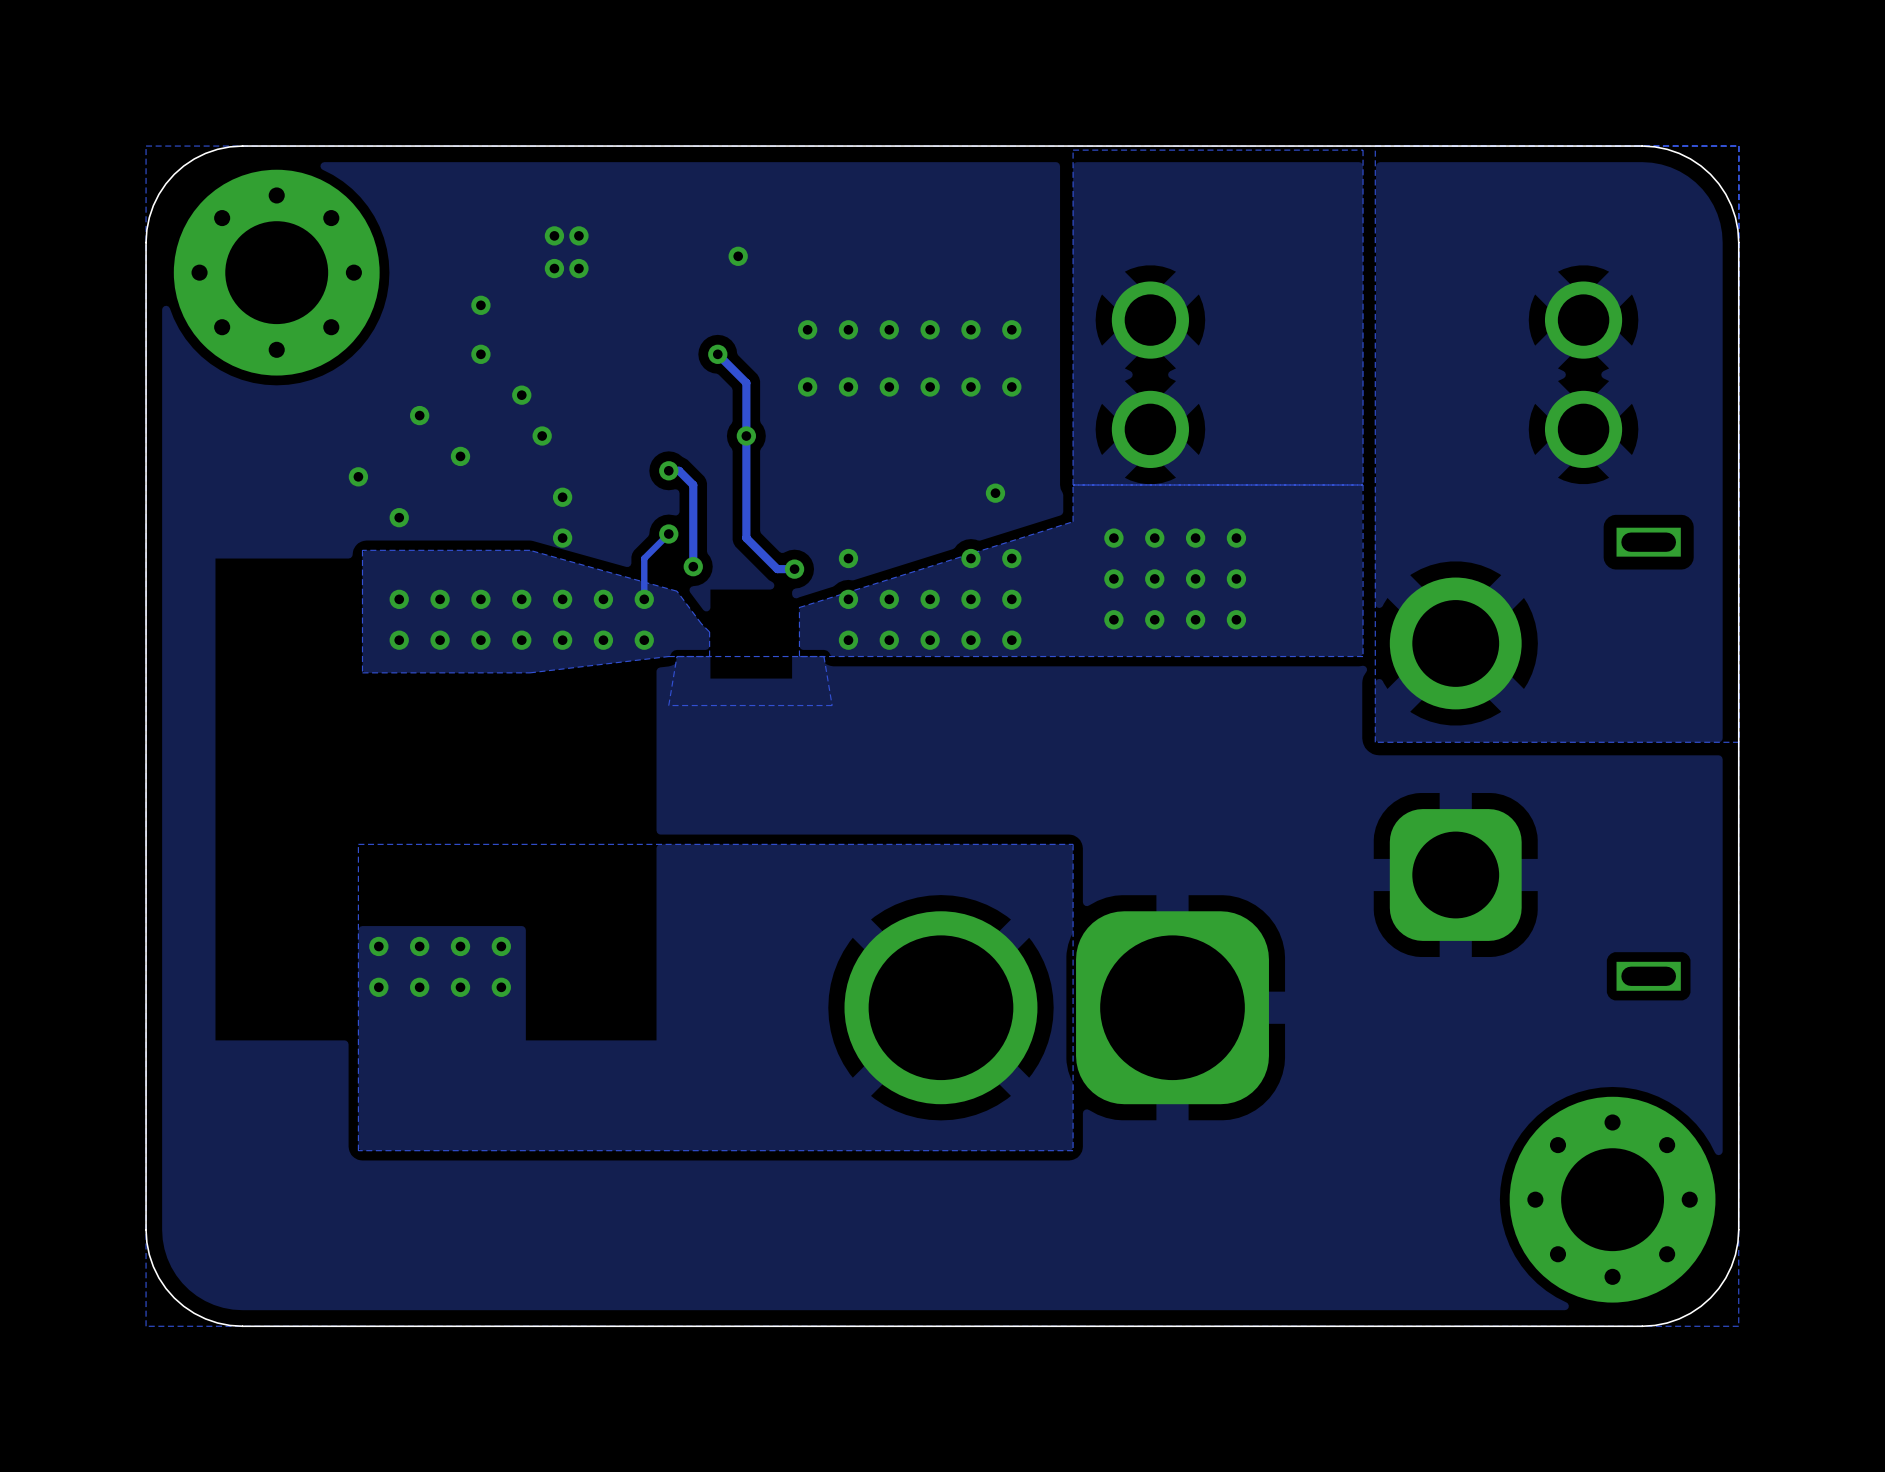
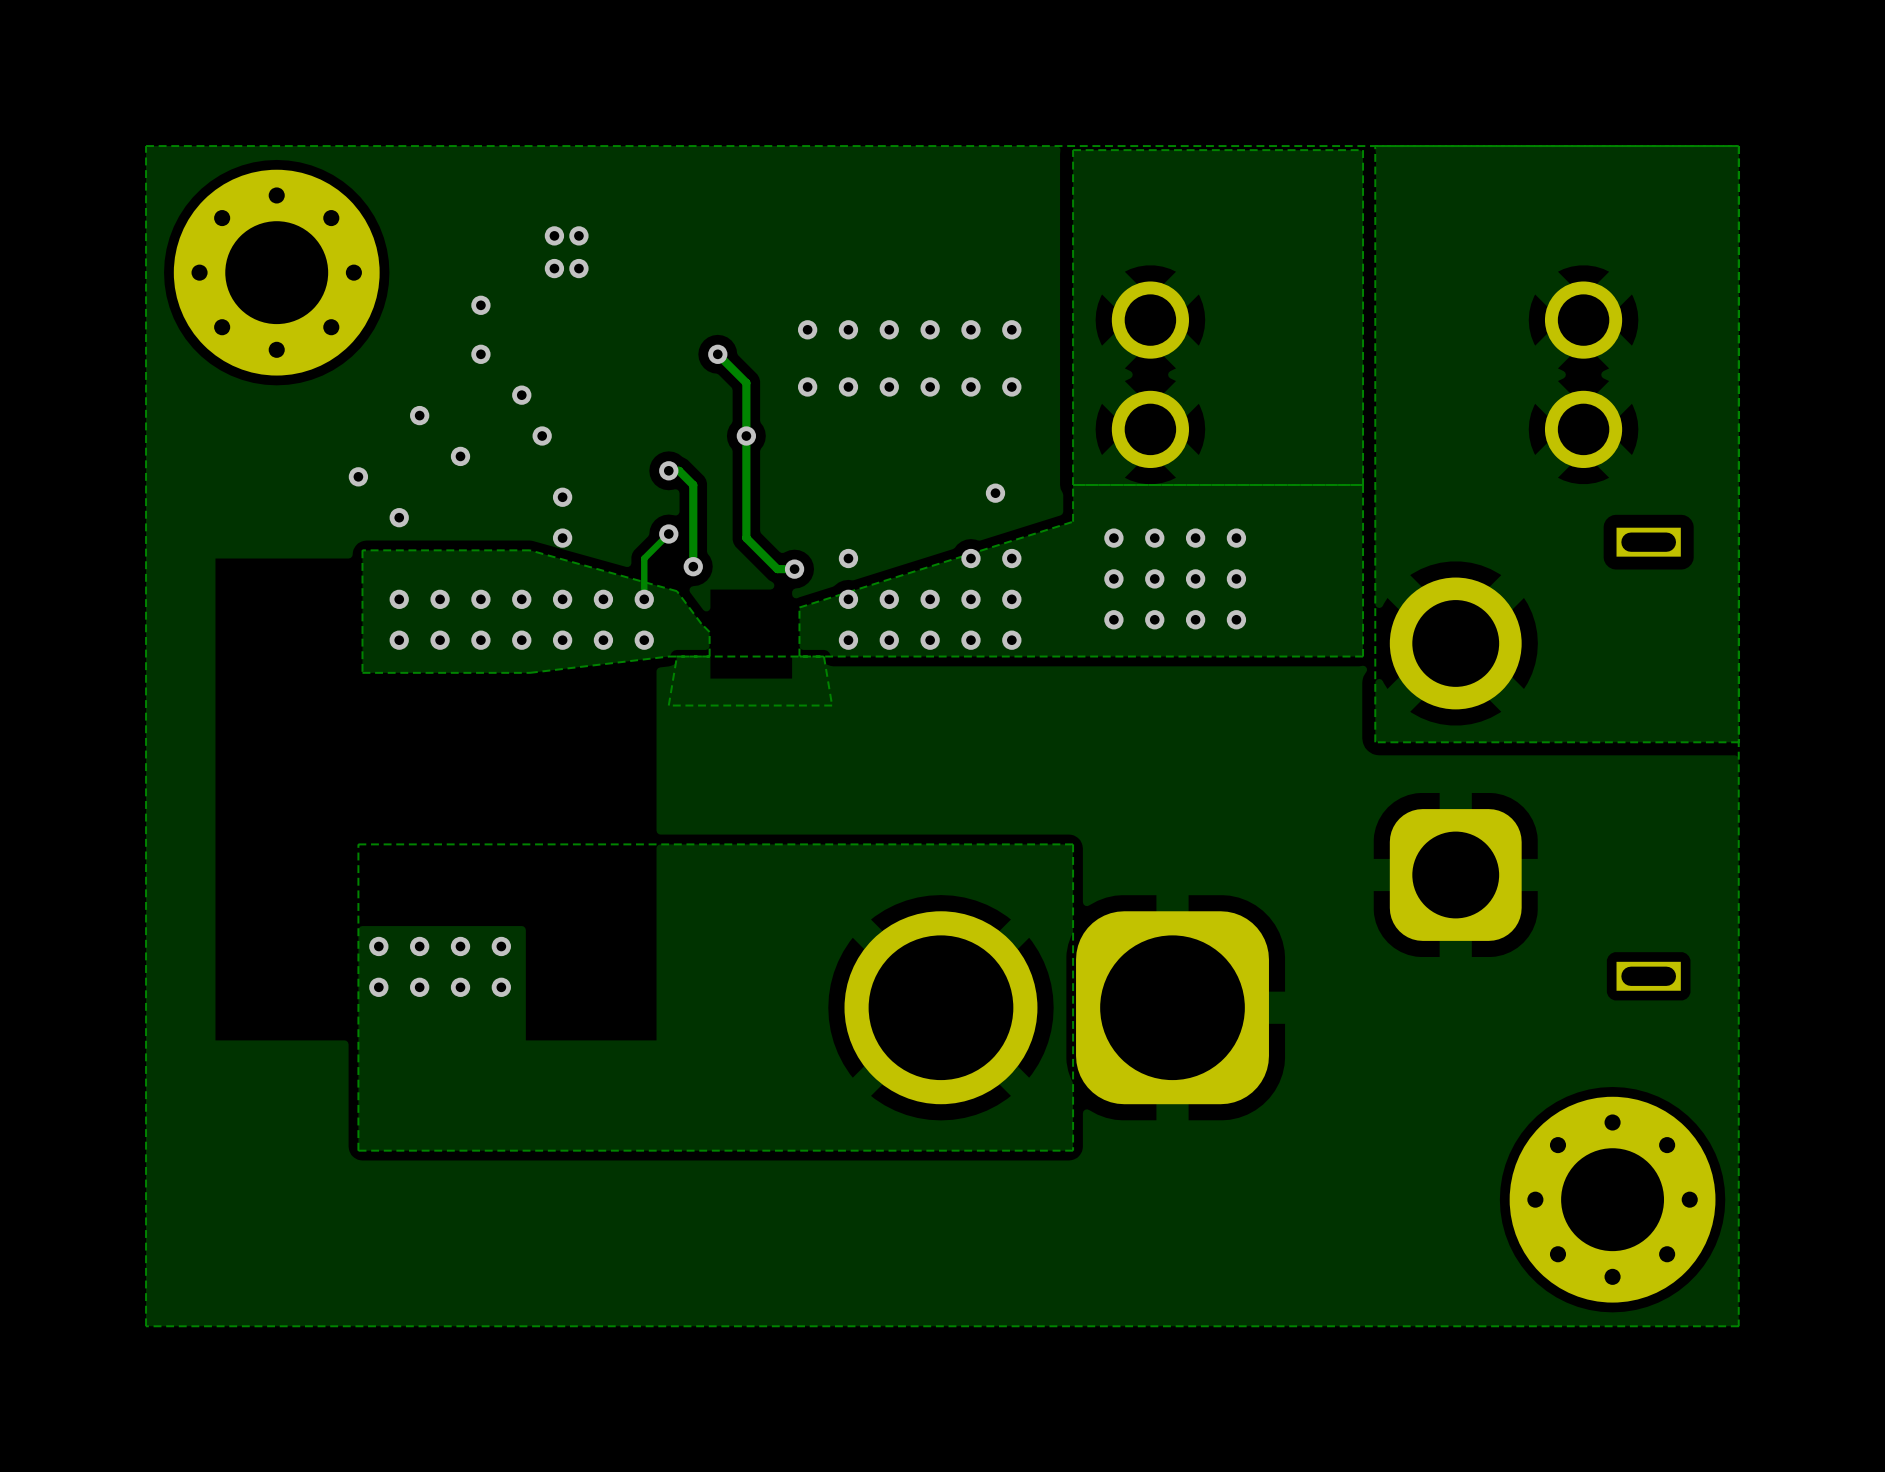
board edge: (1642, 146) (242, 146) (217, 149) (194, 158) (183, 165) (165, 183) (158, 194) (149, 217) (146, 242) (146, 1229) (146, 1242) (153, 1266) (165, 1288) (183, 1306) (194, 1313) (217, 1322) (242, 1326) (1642, 1326) (1667, 1322) (1690, 1313) (1701, 1306) (1718, 1288) (1731, 1266) (1737, 1242) (1738, 1229) (1738, 242) (1737, 229) (1731, 205) (1718, 183) (1710, 174) (1701, 165) (1679, 153) (1667, 149) (1642, 146) -> none
via: (738, 256) -> none

